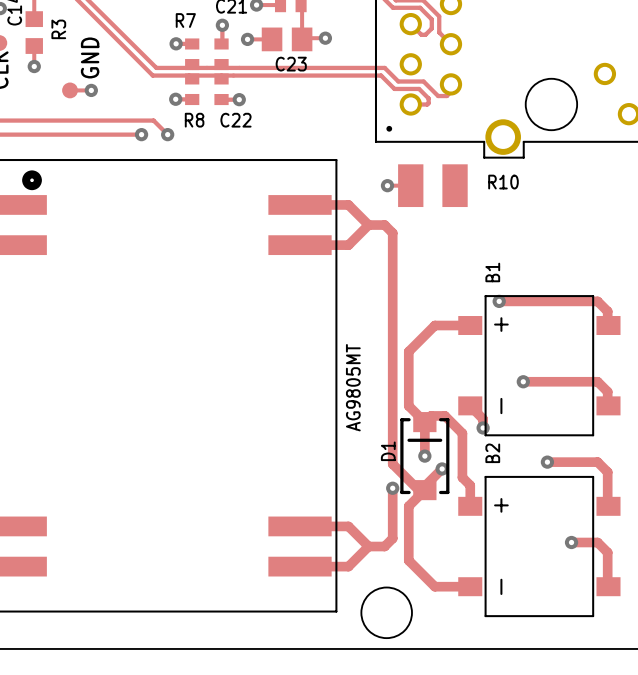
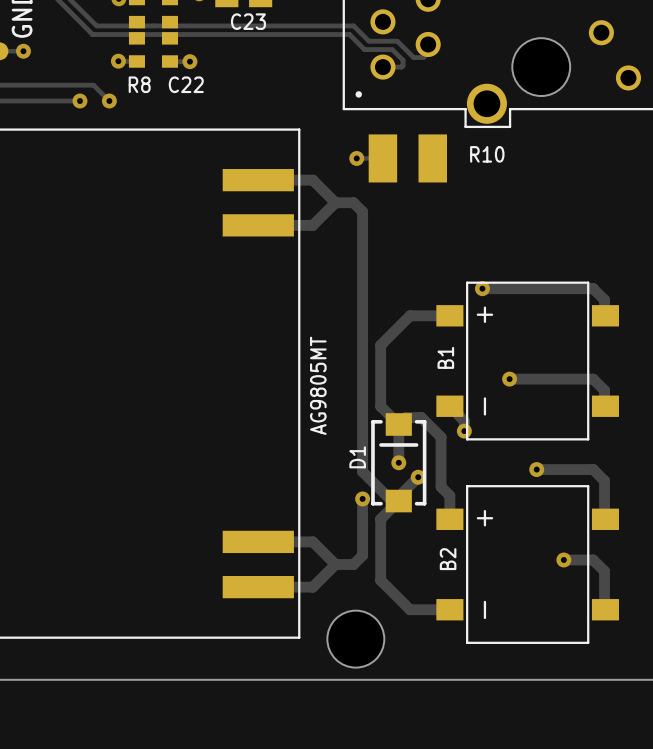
B1 name position: B1 (492, 272) -> B1 (445, 357)
B2 name position: B2 (492, 453) -> B2 (448, 559)

